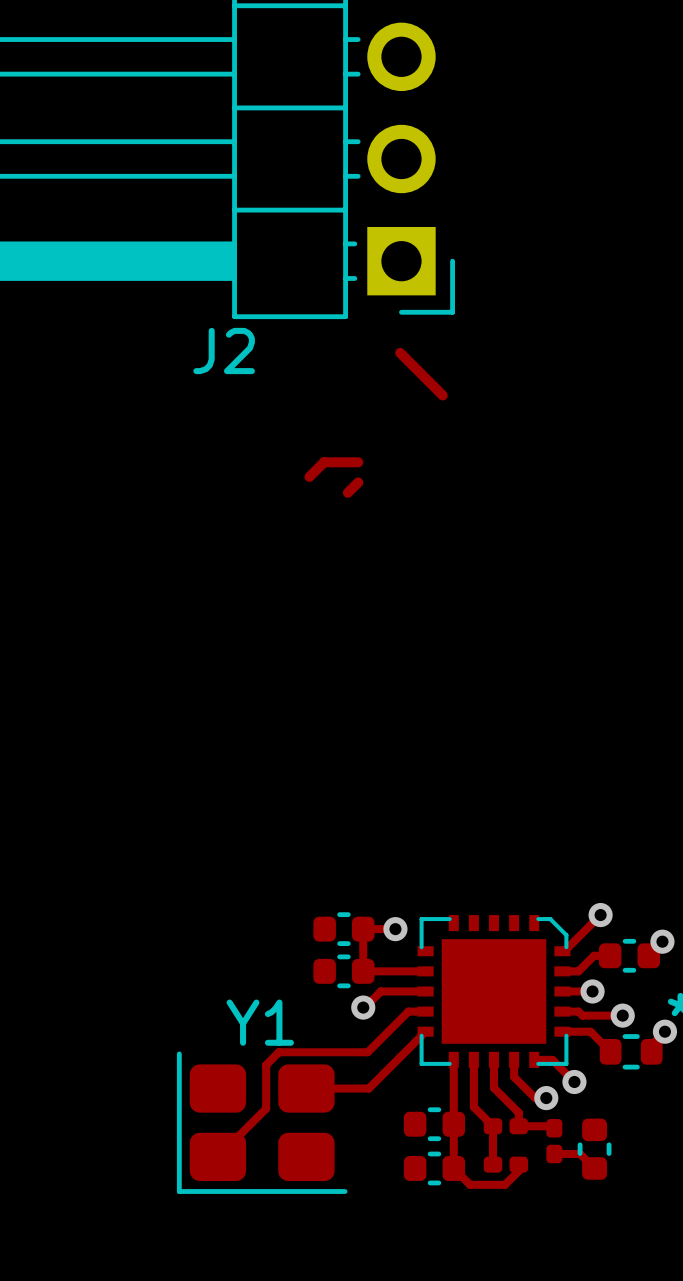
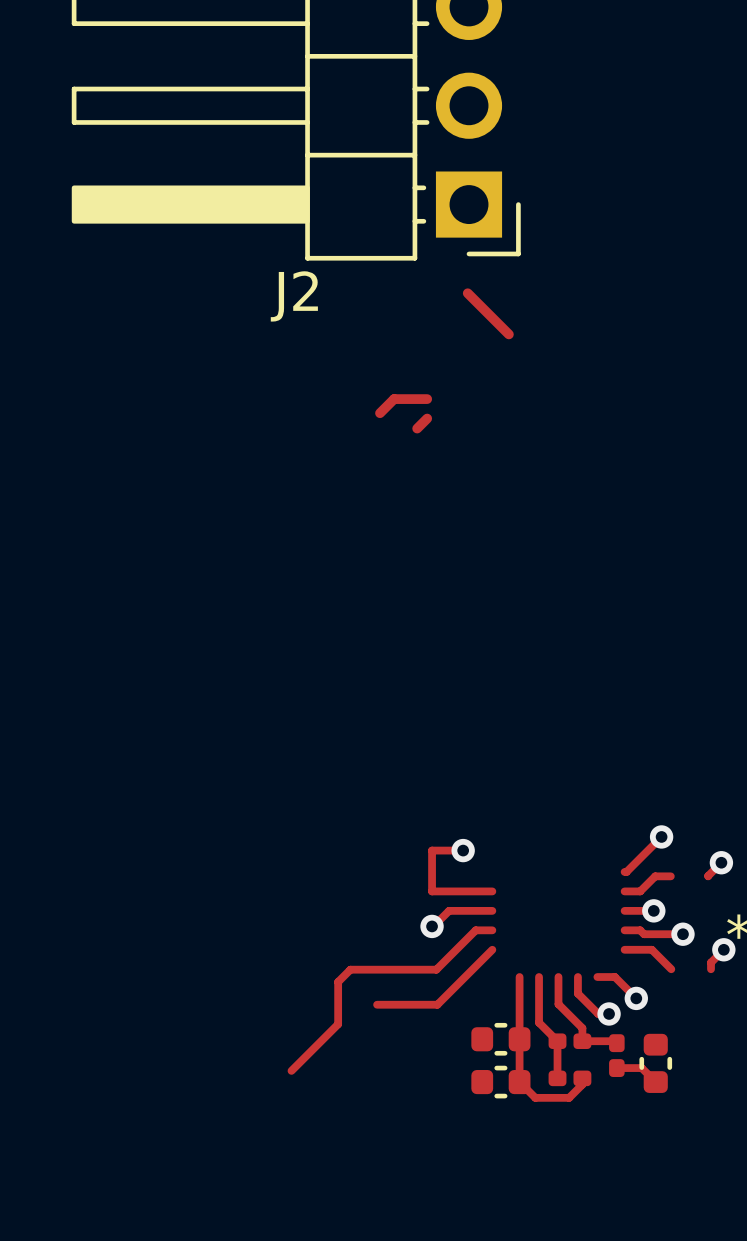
part: (343, 929) -> none
part: (629, 955) -> none
part: (343, 971) -> none
part: (494, 991) -> none
part: (631, 1051) -> none
Y1: (262, 1122) -> none

